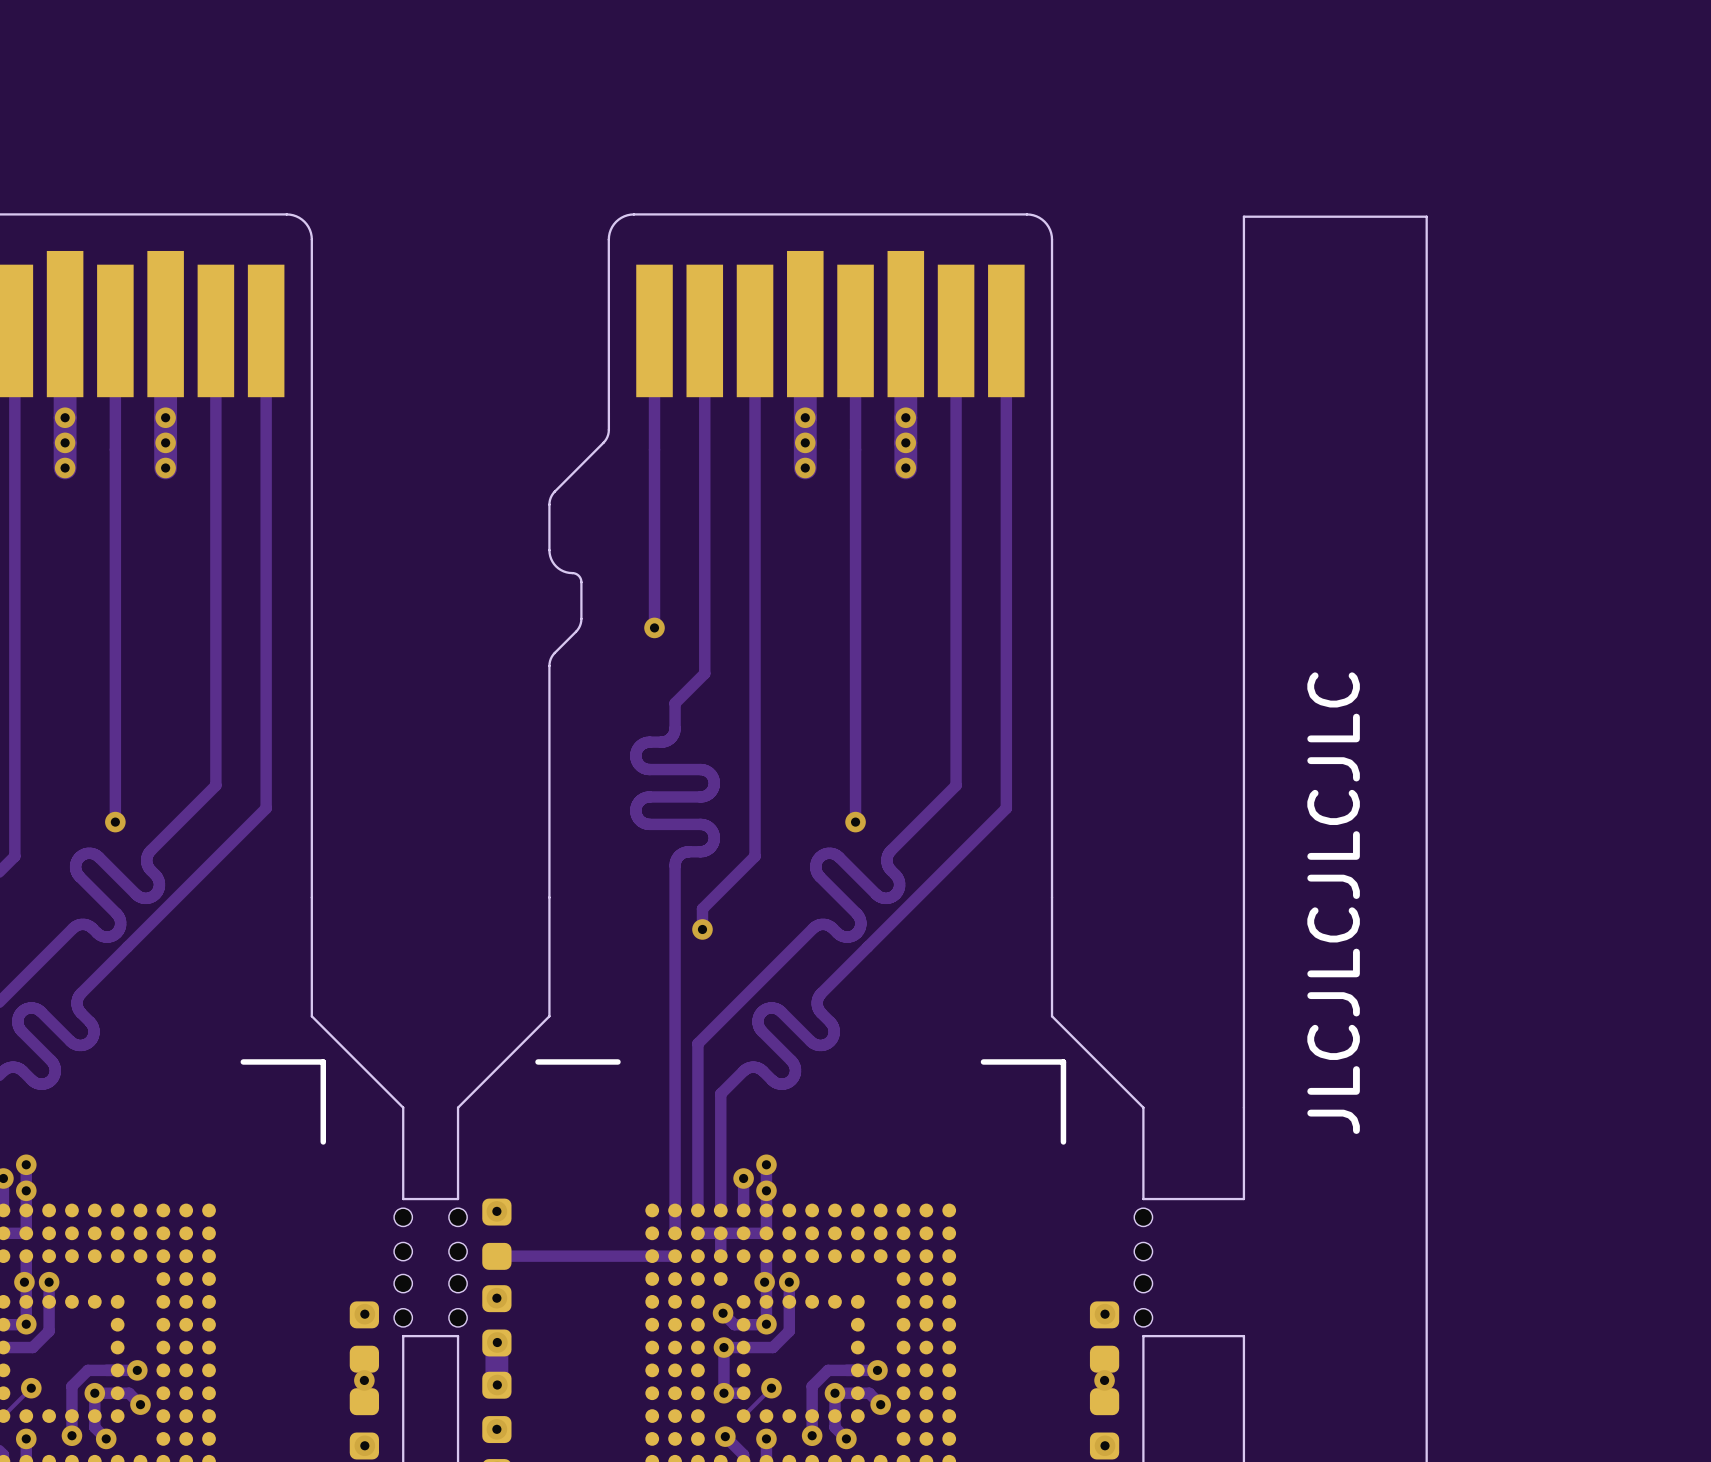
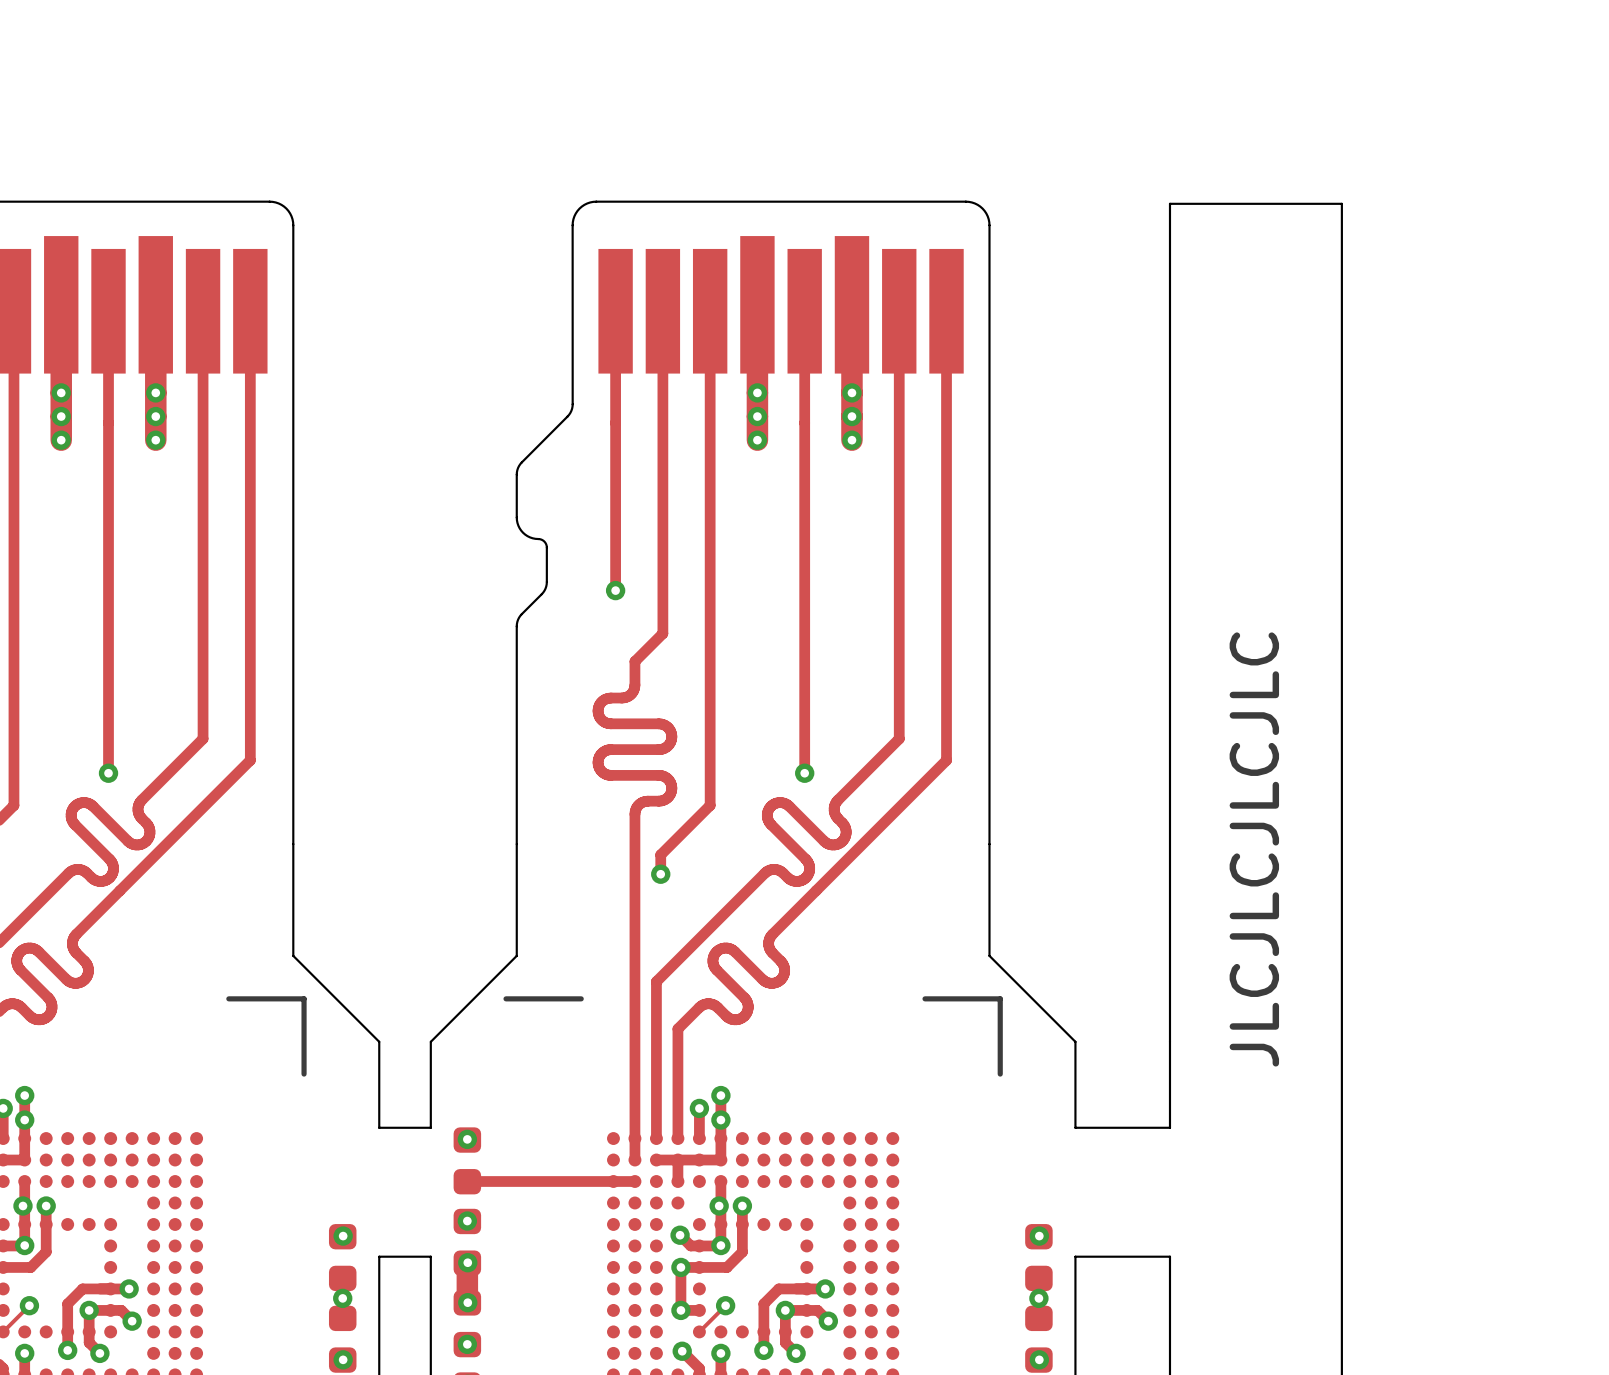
part: (403, 1217) -> none
part: (458, 1217) -> none
part: (1143, 1217) -> none
part: (403, 1251) -> none
part: (458, 1251) -> none
part: (1143, 1251) -> none
part: (403, 1283) -> none
part: (458, 1283) -> none
part: (1143, 1283) -> none
part: (403, 1317) -> none
part: (458, 1317) -> none
part: (1143, 1317) -> none

